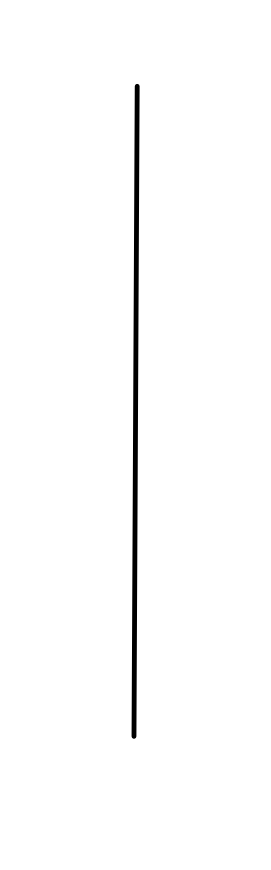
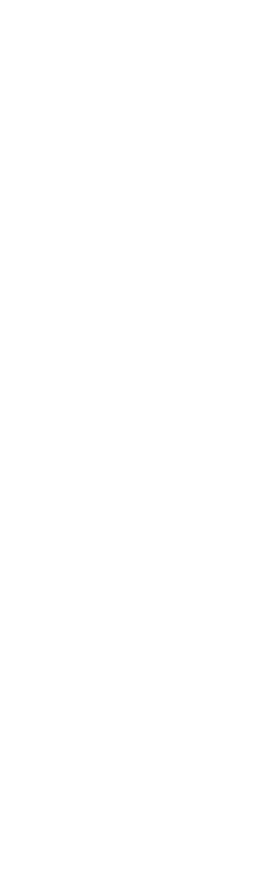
line: (137, 86) (133, 736) -> none

